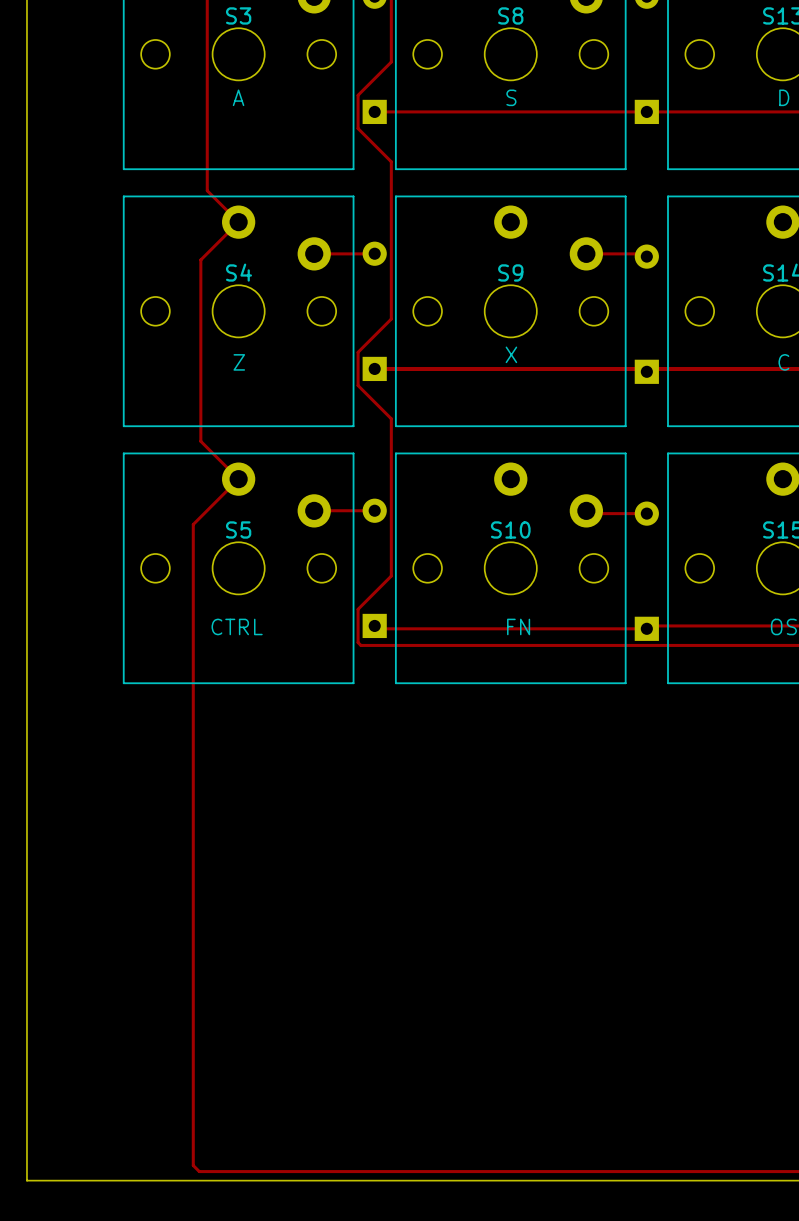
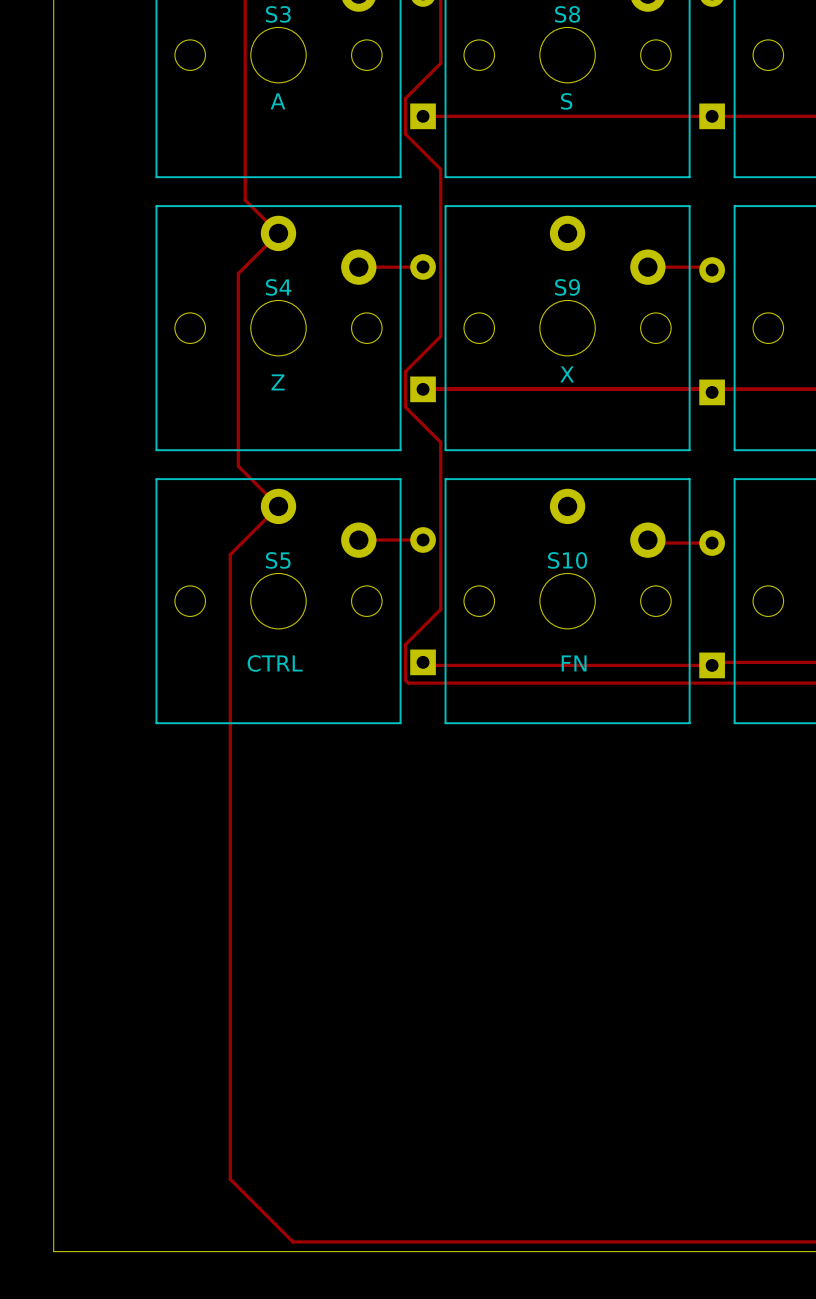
track: (193, 1112) (193, 1165) (199, 1171) (252, 1171) -> (230, 1179) (292, 1241)

